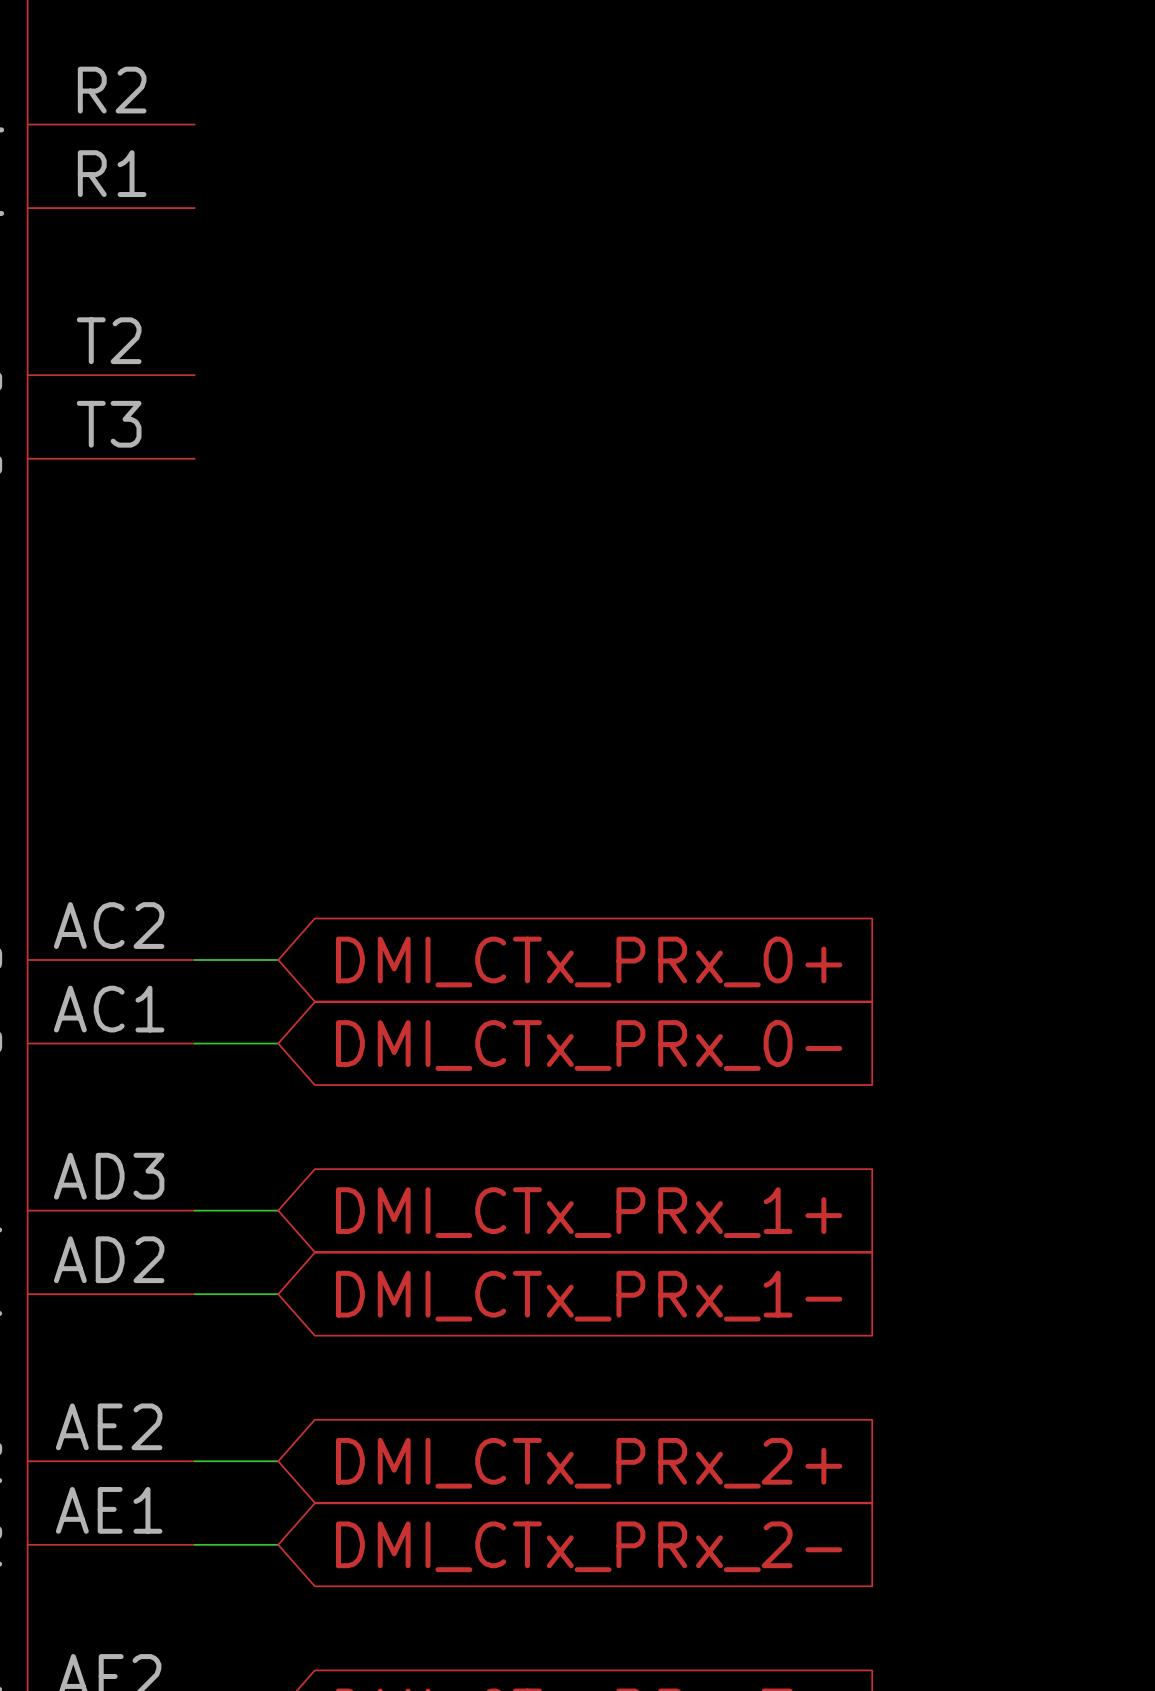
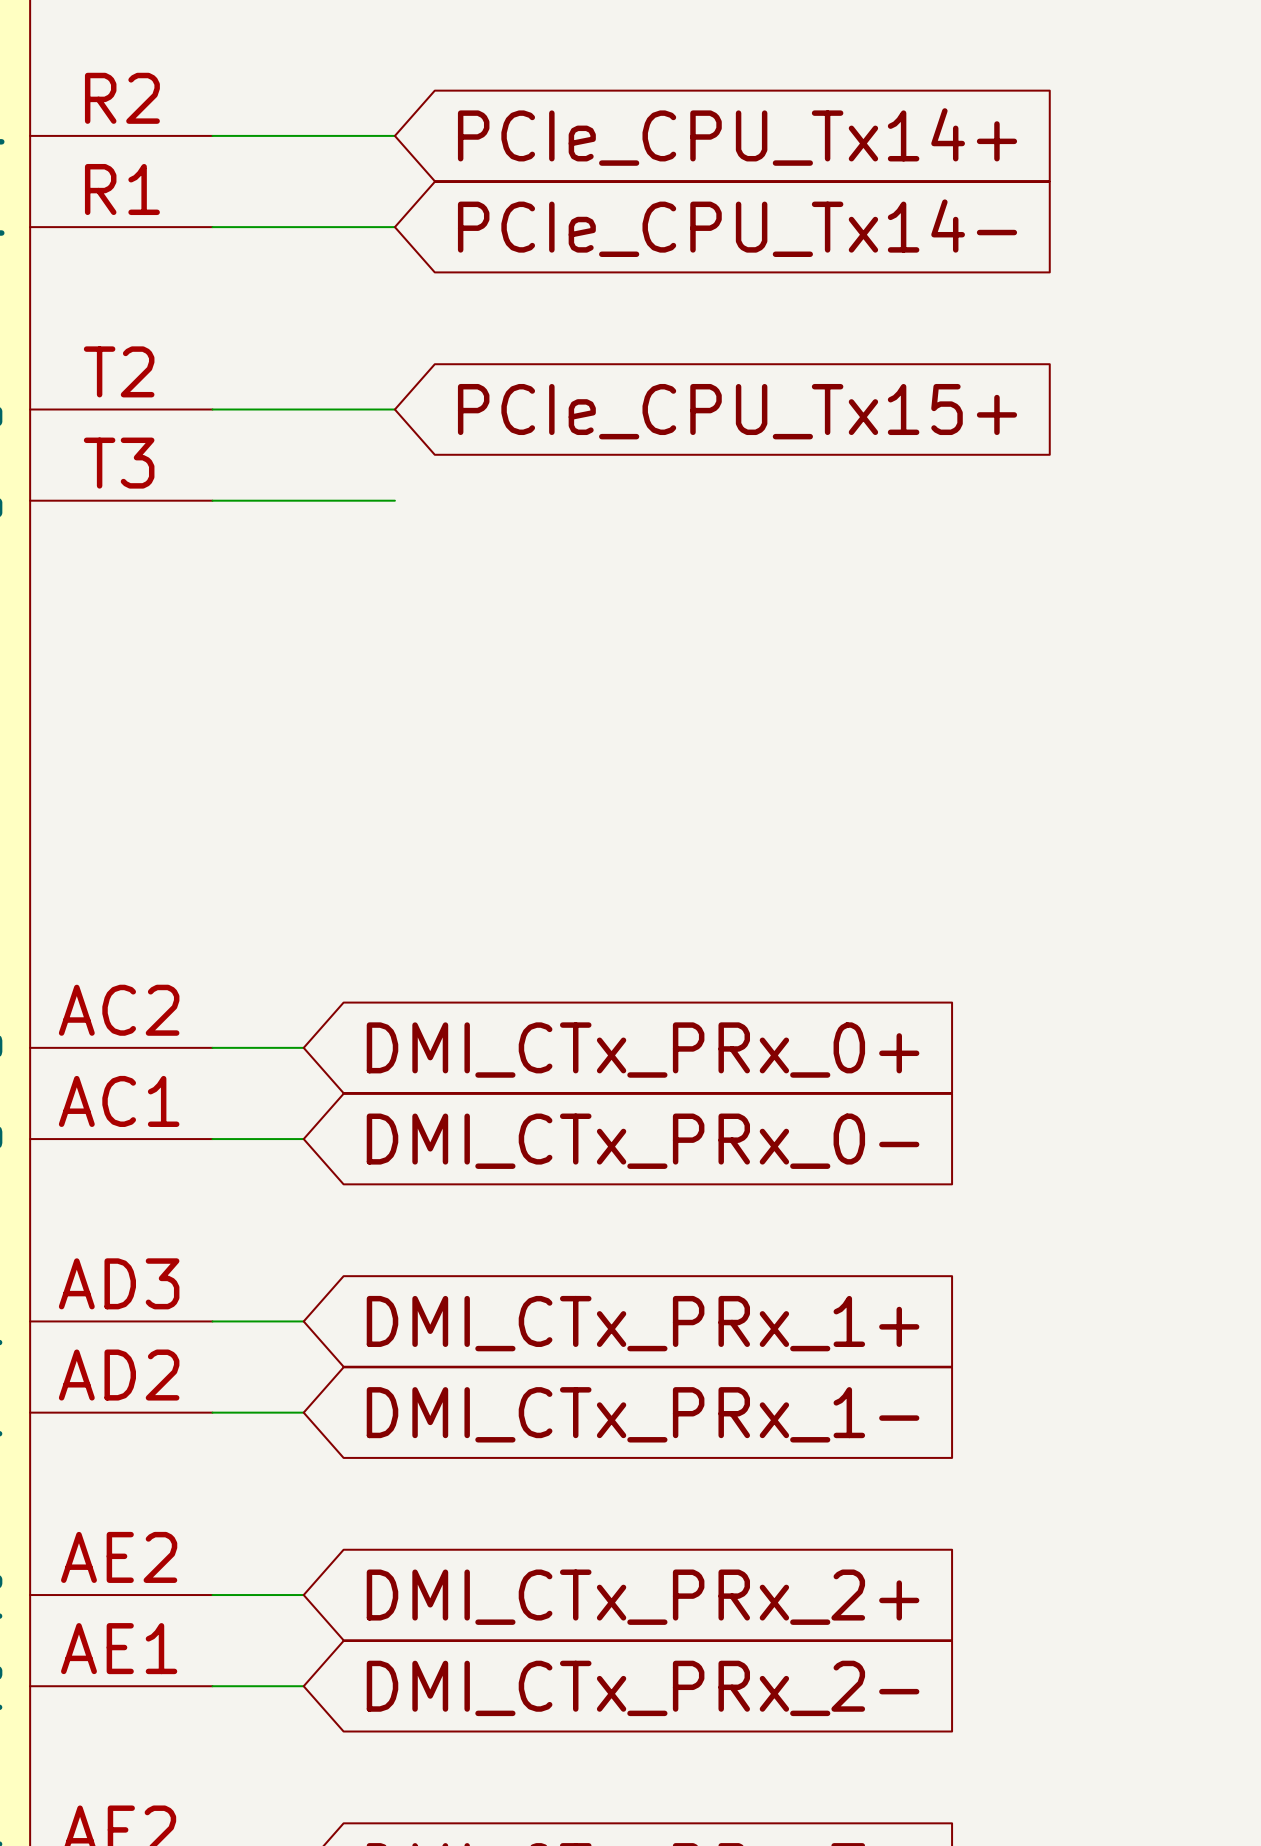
wire: none -> (212, 135) (394, 135)
global label: none -> PCIe_CPU_Tx14+ (737, 137)
wire: none -> (212, 227) (394, 227)
global label: none -> PCIe_CPU_Tx14- (737, 228)
wire: none -> (212, 409) (394, 409)
global label: none -> PCIe_CPU_Tx15+ (737, 411)
wire: none -> (212, 500) (394, 500)

